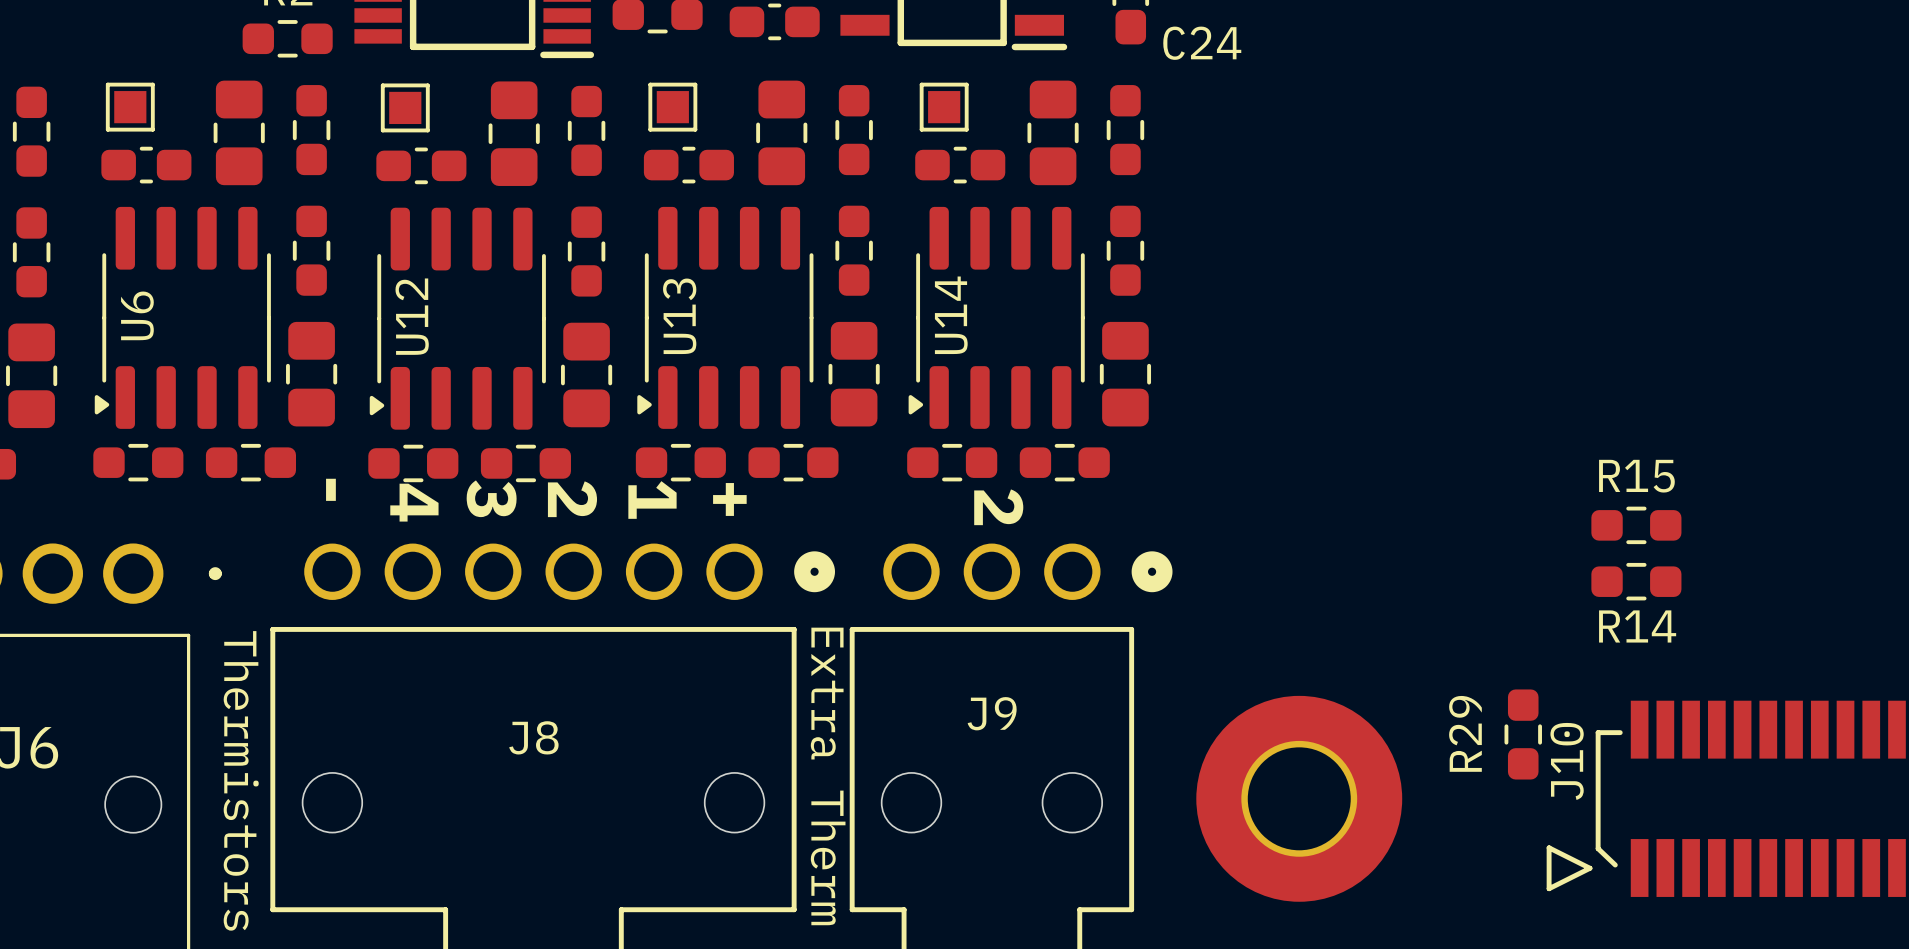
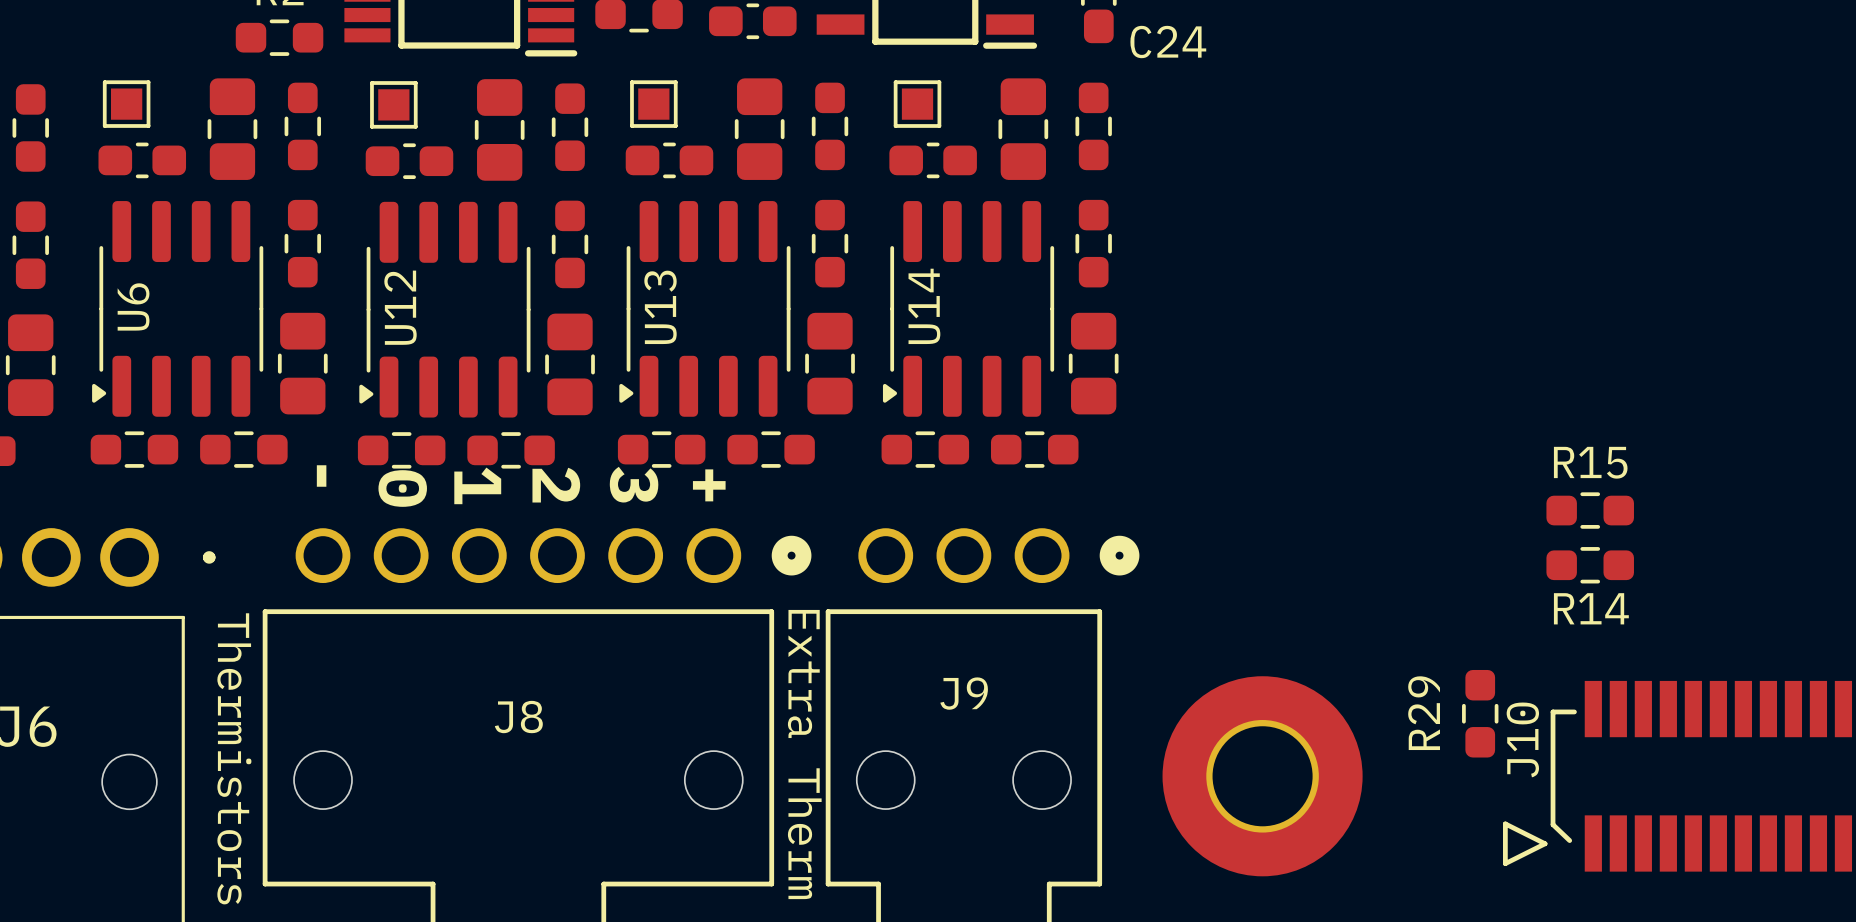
text: 3 (491, 498) -> 1 (477, 485)
text: 1 (652, 500) -> 3 (634, 484)
text: 4 (414, 502) -> 0 (402, 488)
text: 2 (998, 507) -> none

